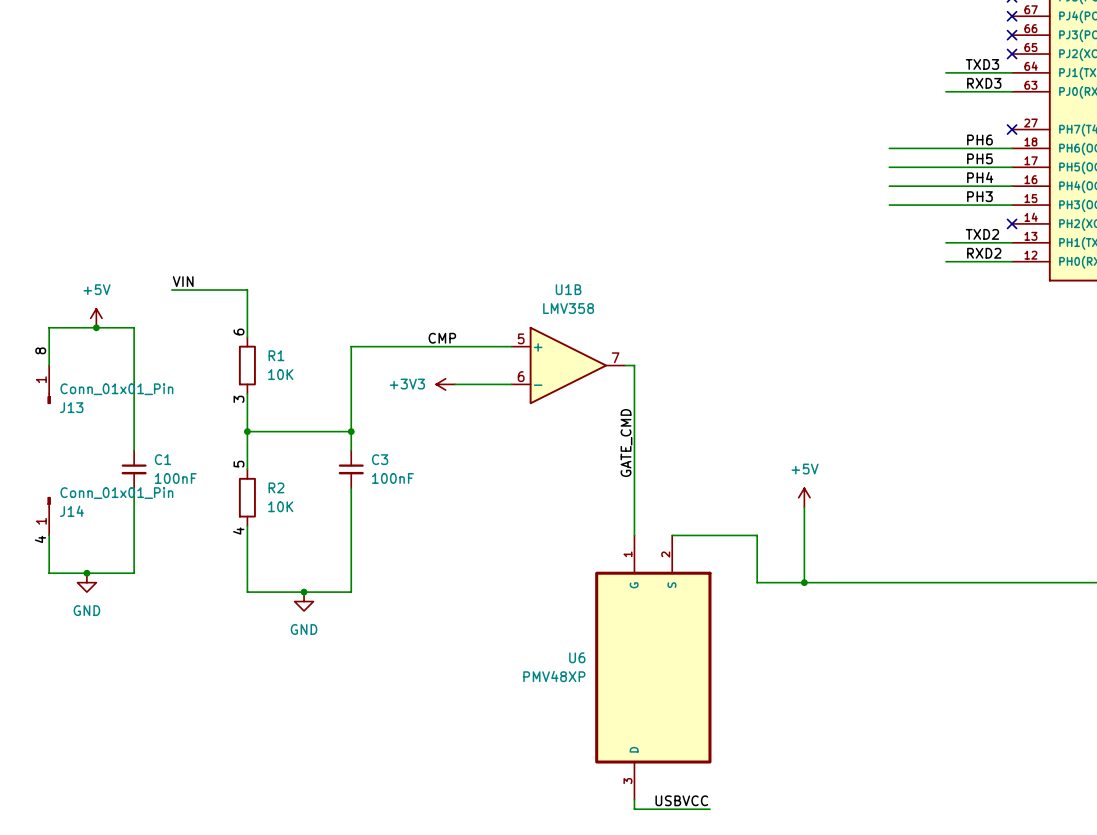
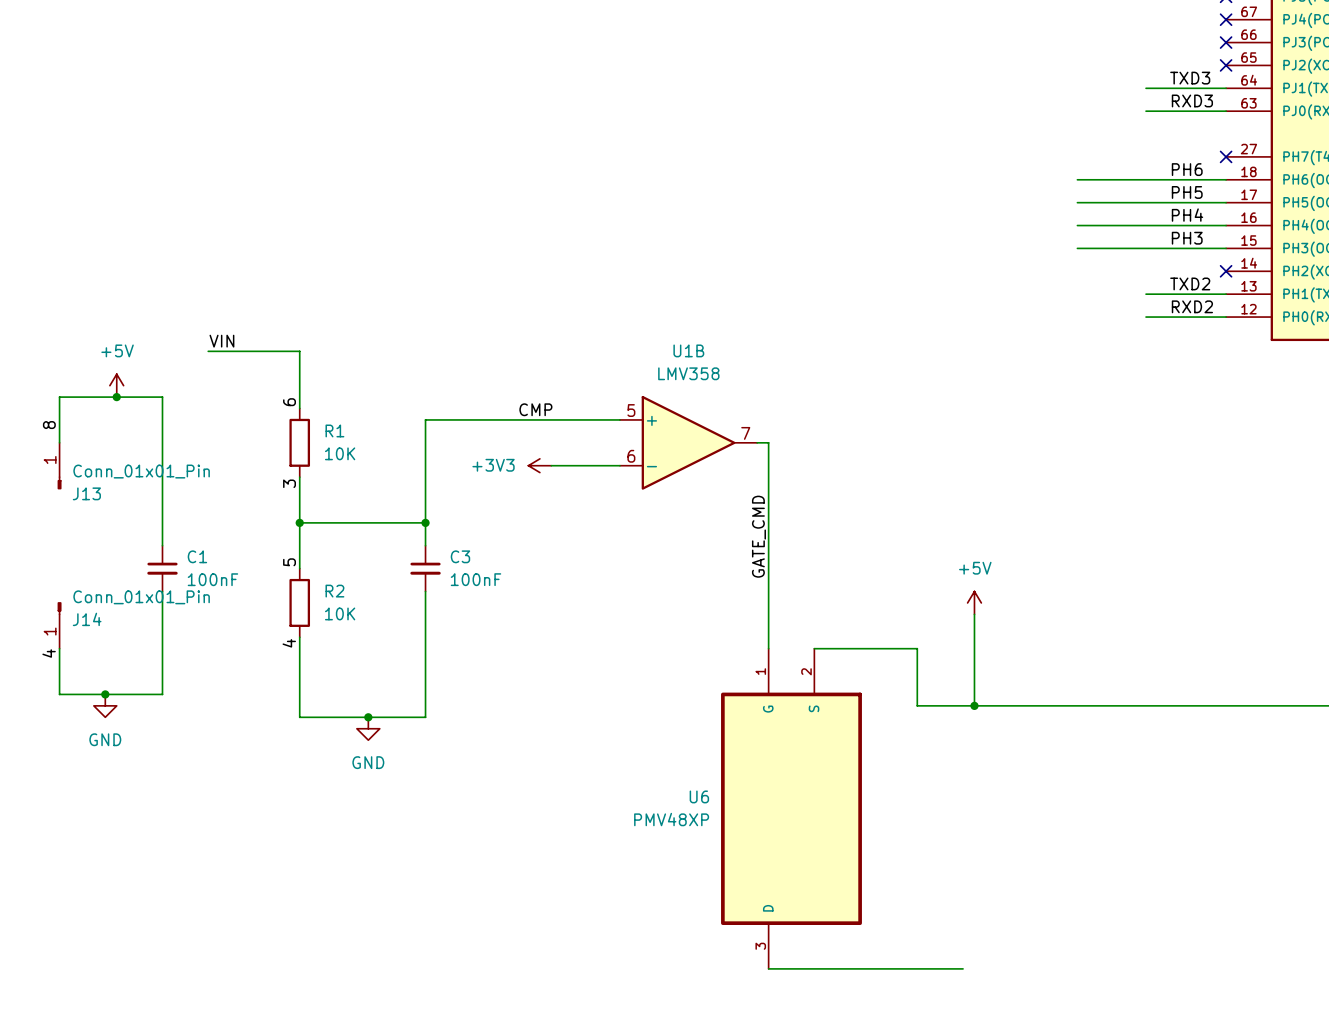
wire: (634, 799) (634, 809) (709, 809) -> (768, 968) (963, 968)
label: USBVCC (681, 800) -> none

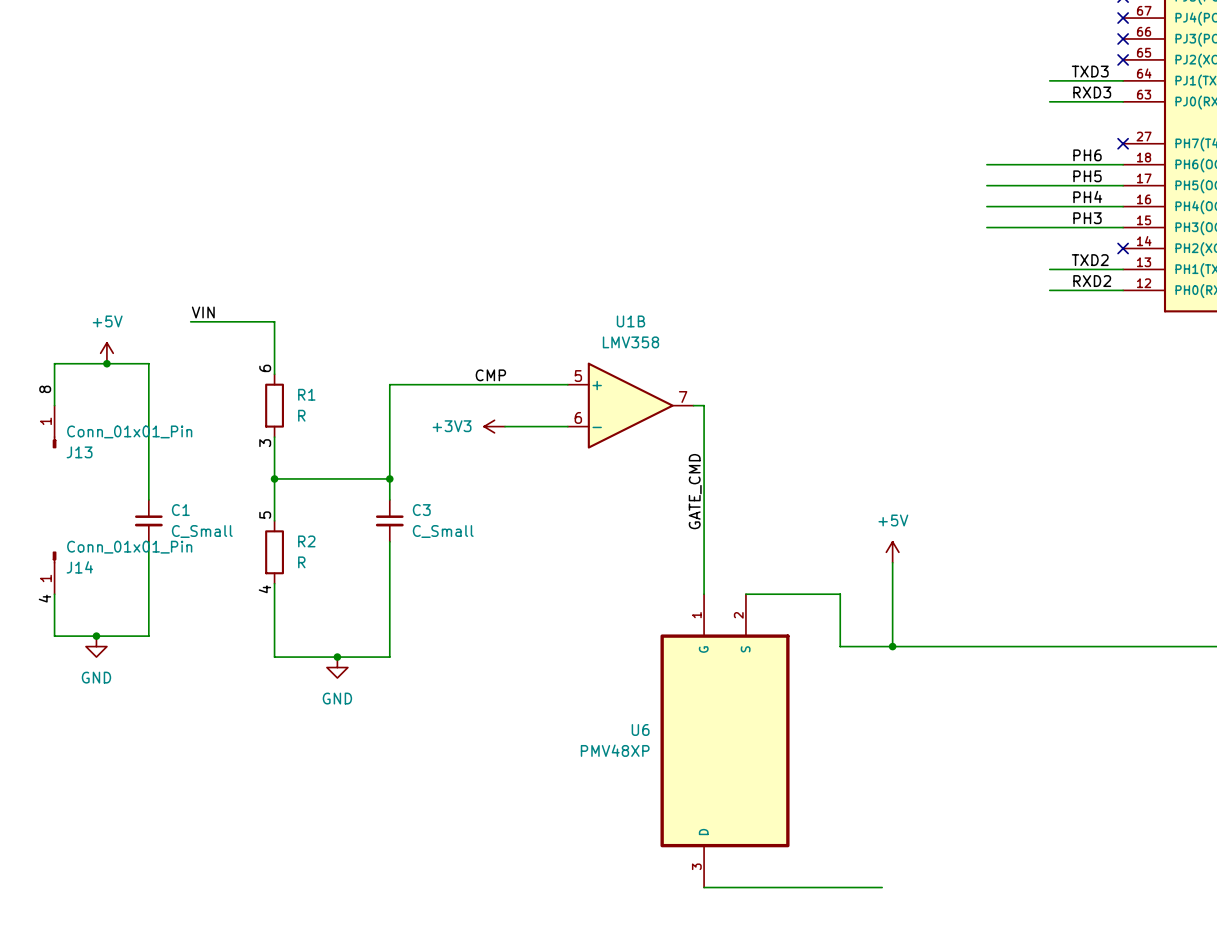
R1 value: 10K (340, 453) -> R (301, 415)
C1 value: 100nF (212, 579) -> C_Small (202, 531)
C3 value: 100nF (475, 579) -> C_Small (443, 531)
R2 value: 10K (340, 613) -> R (301, 562)

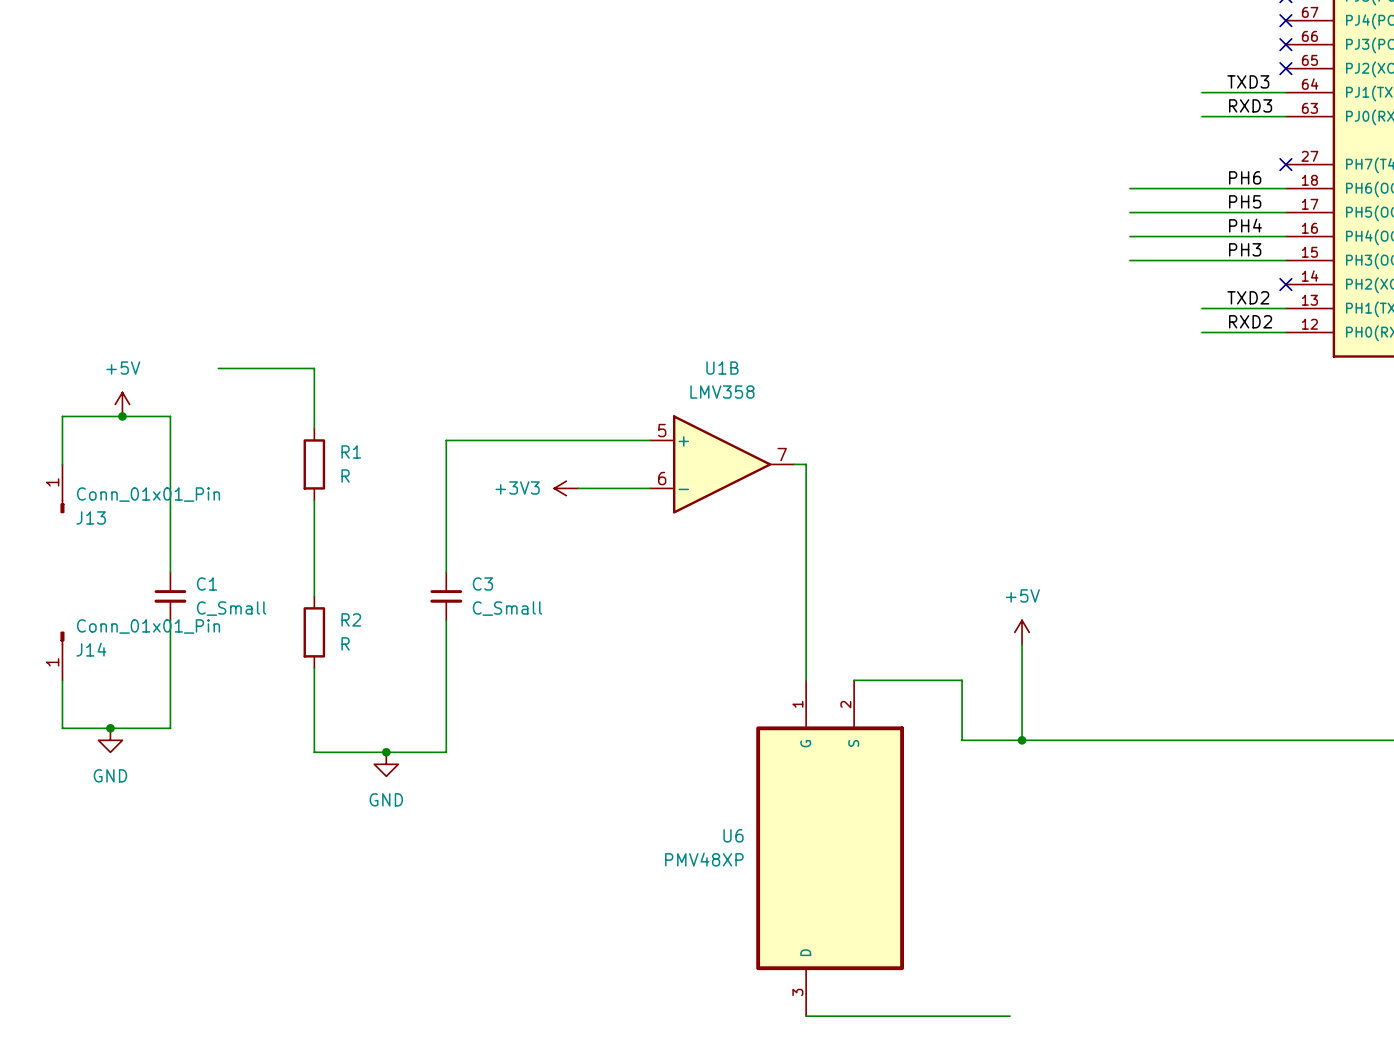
label: VIN (203, 312) -> none
label: 6 (265, 368) -> none
label: CMP (490, 375) -> none
label: 8 (45, 389) -> none
label: 3 (265, 443) -> none
wire: (274, 478) (389, 478) -> none
junction: (274, 478) -> none
junction: (389, 478) -> none
label: GATE_CMD (695, 491) -> none
label: 5 (265, 515) -> none
label: 4 (264, 589) -> none
label: 4 (44, 598) -> none

